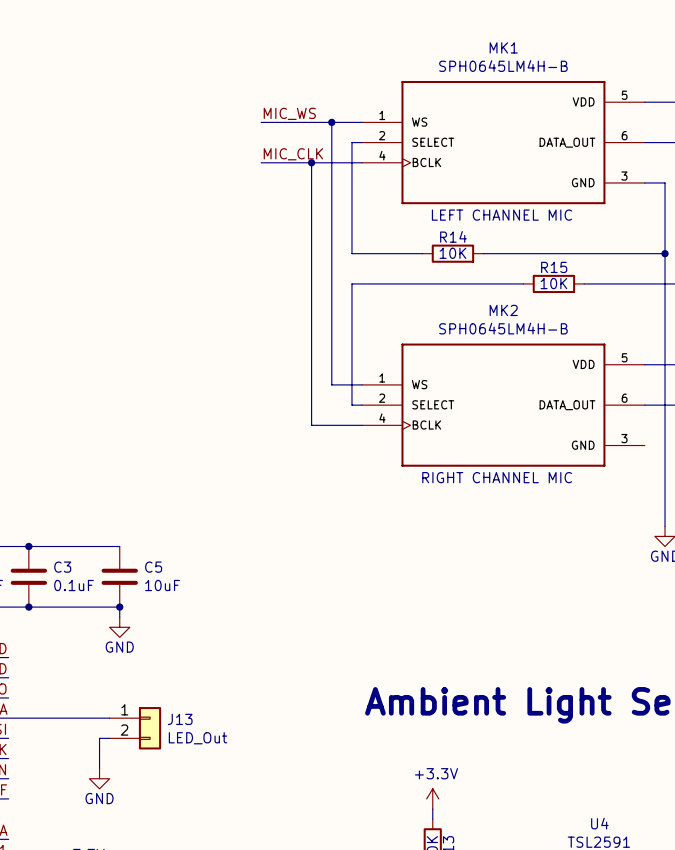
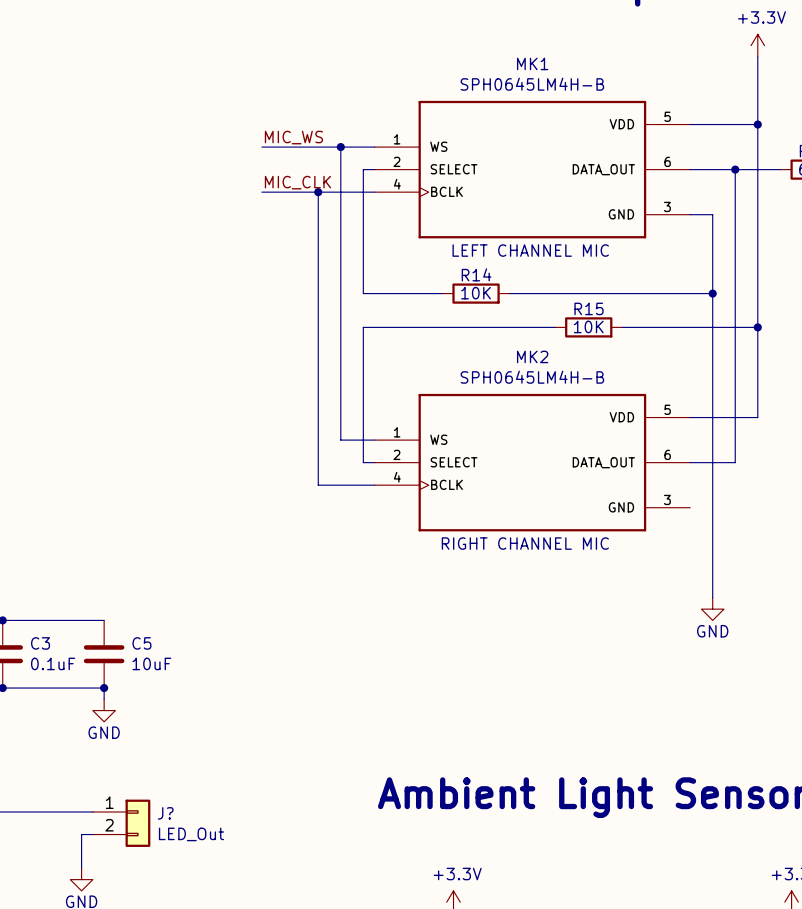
J13 name: J13 (180, 719) -> J? (165, 813)

